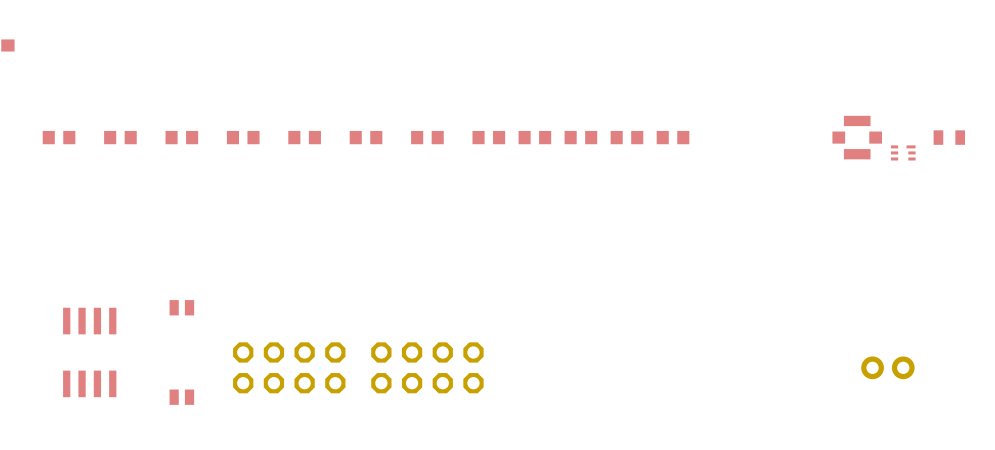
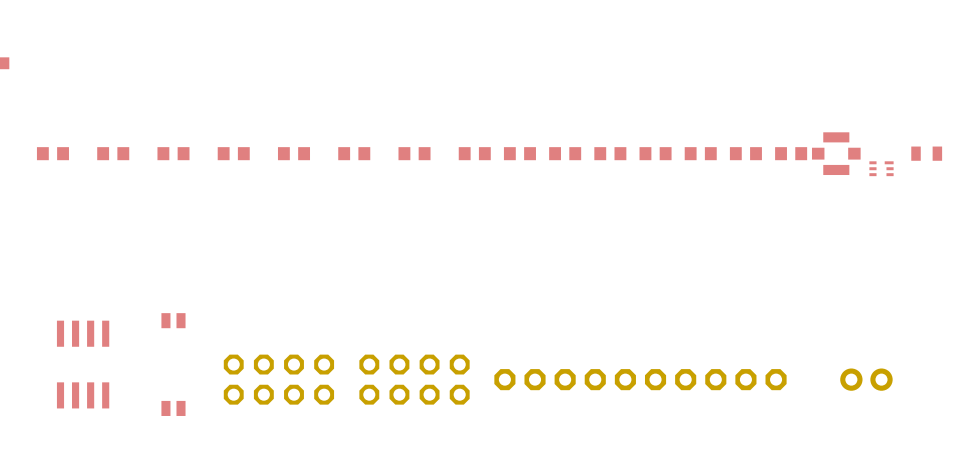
part: none -> (700, 153)
part: none -> (745, 153)
part: none -> (791, 153)
part: none -> (640, 379)

